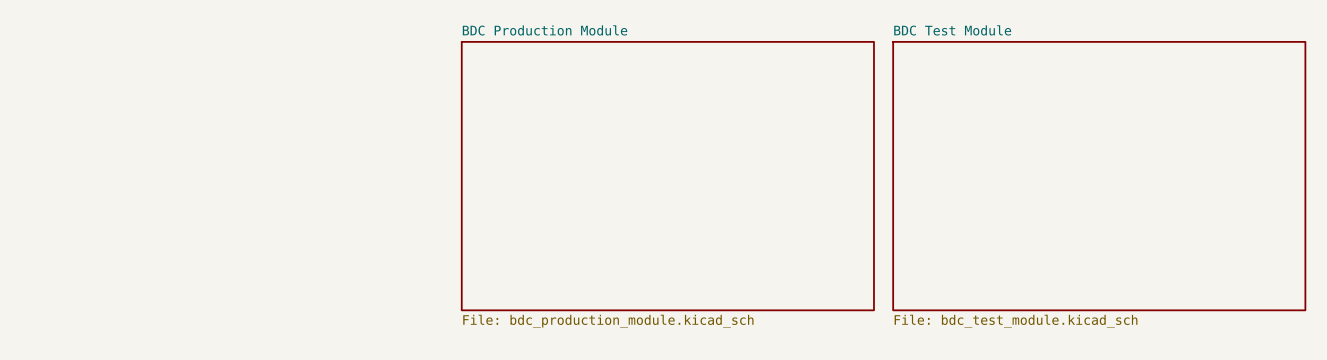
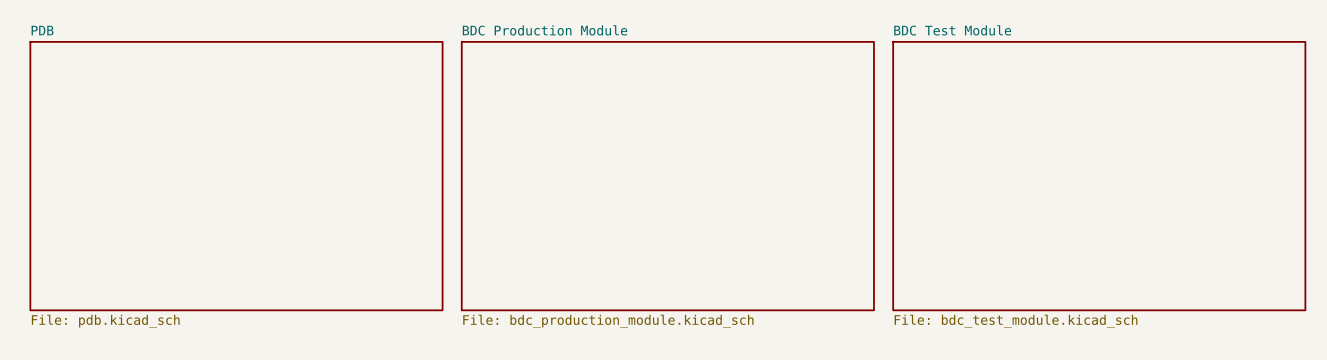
sheet PDB: none -> File: pdb.kicad_sch (236, 176)

